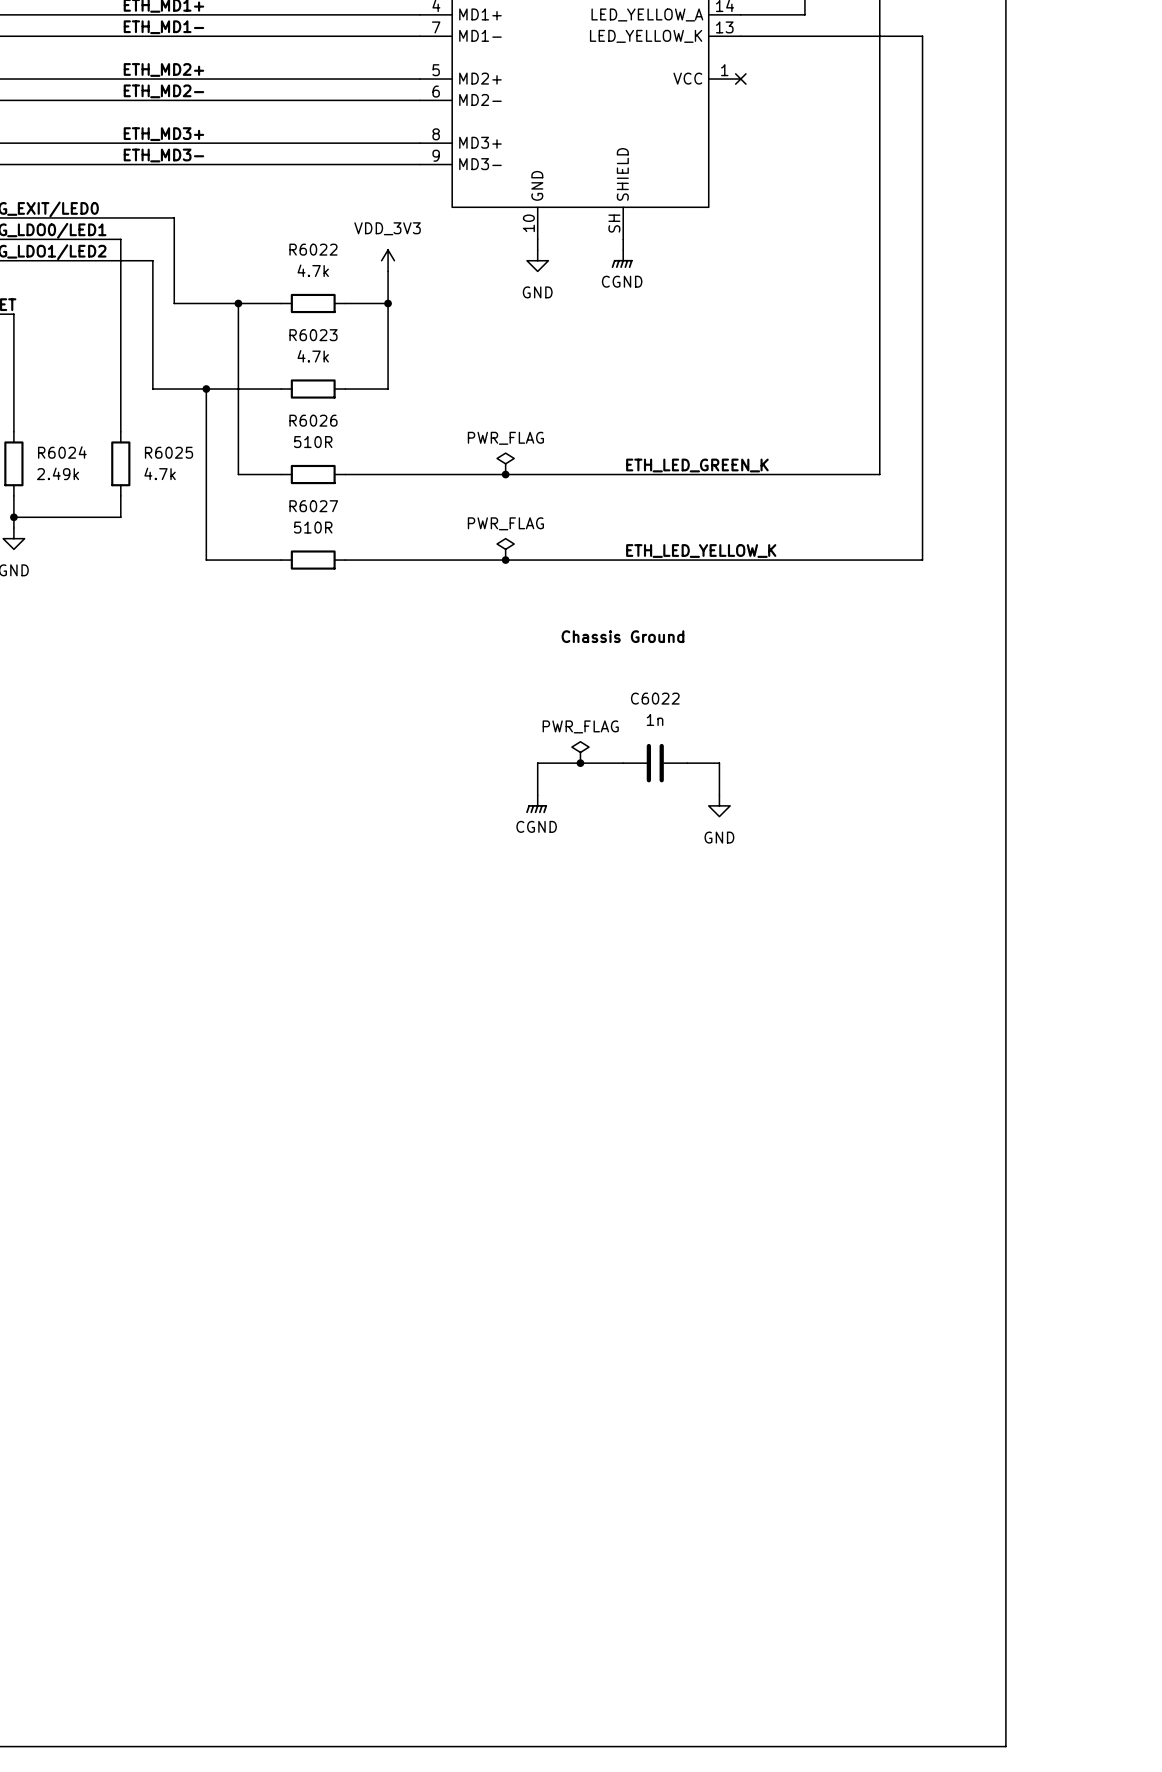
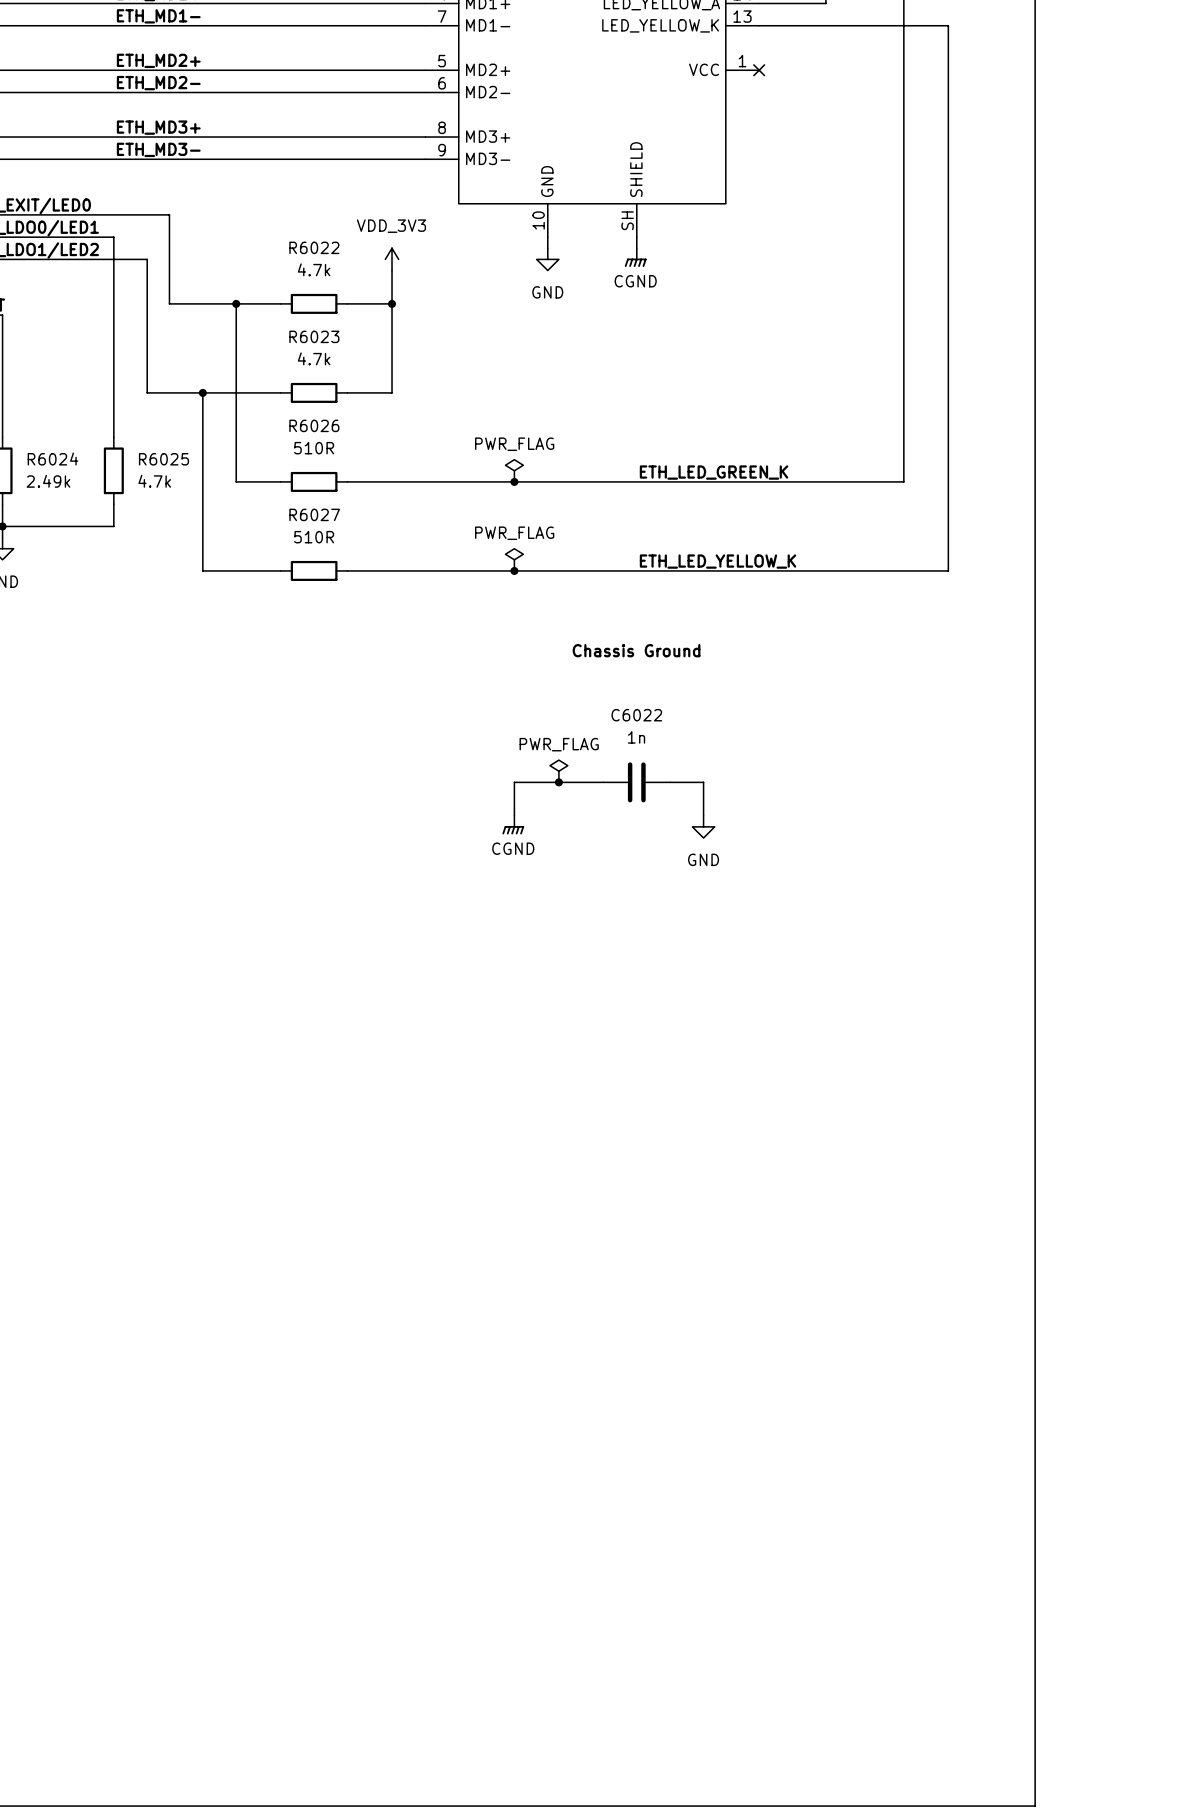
power symbol position: PWR_FLAG (580, 752) -> PWR_FLAG (558, 771)
wire: (537, 763) (537, 795) -> (547, 782) (514, 782) (514, 815)
junction position: (580, 763) -> (558, 782)
C6022 position: (655, 763) -> (636, 782)
wire: (687, 763) (719, 763) (719, 795) -> (670, 782) (703, 782) (703, 815)
power symbol position: CGND (536, 804) -> CGND (513, 825)
power symbol position: GND (719, 805) -> GND (703, 826)

